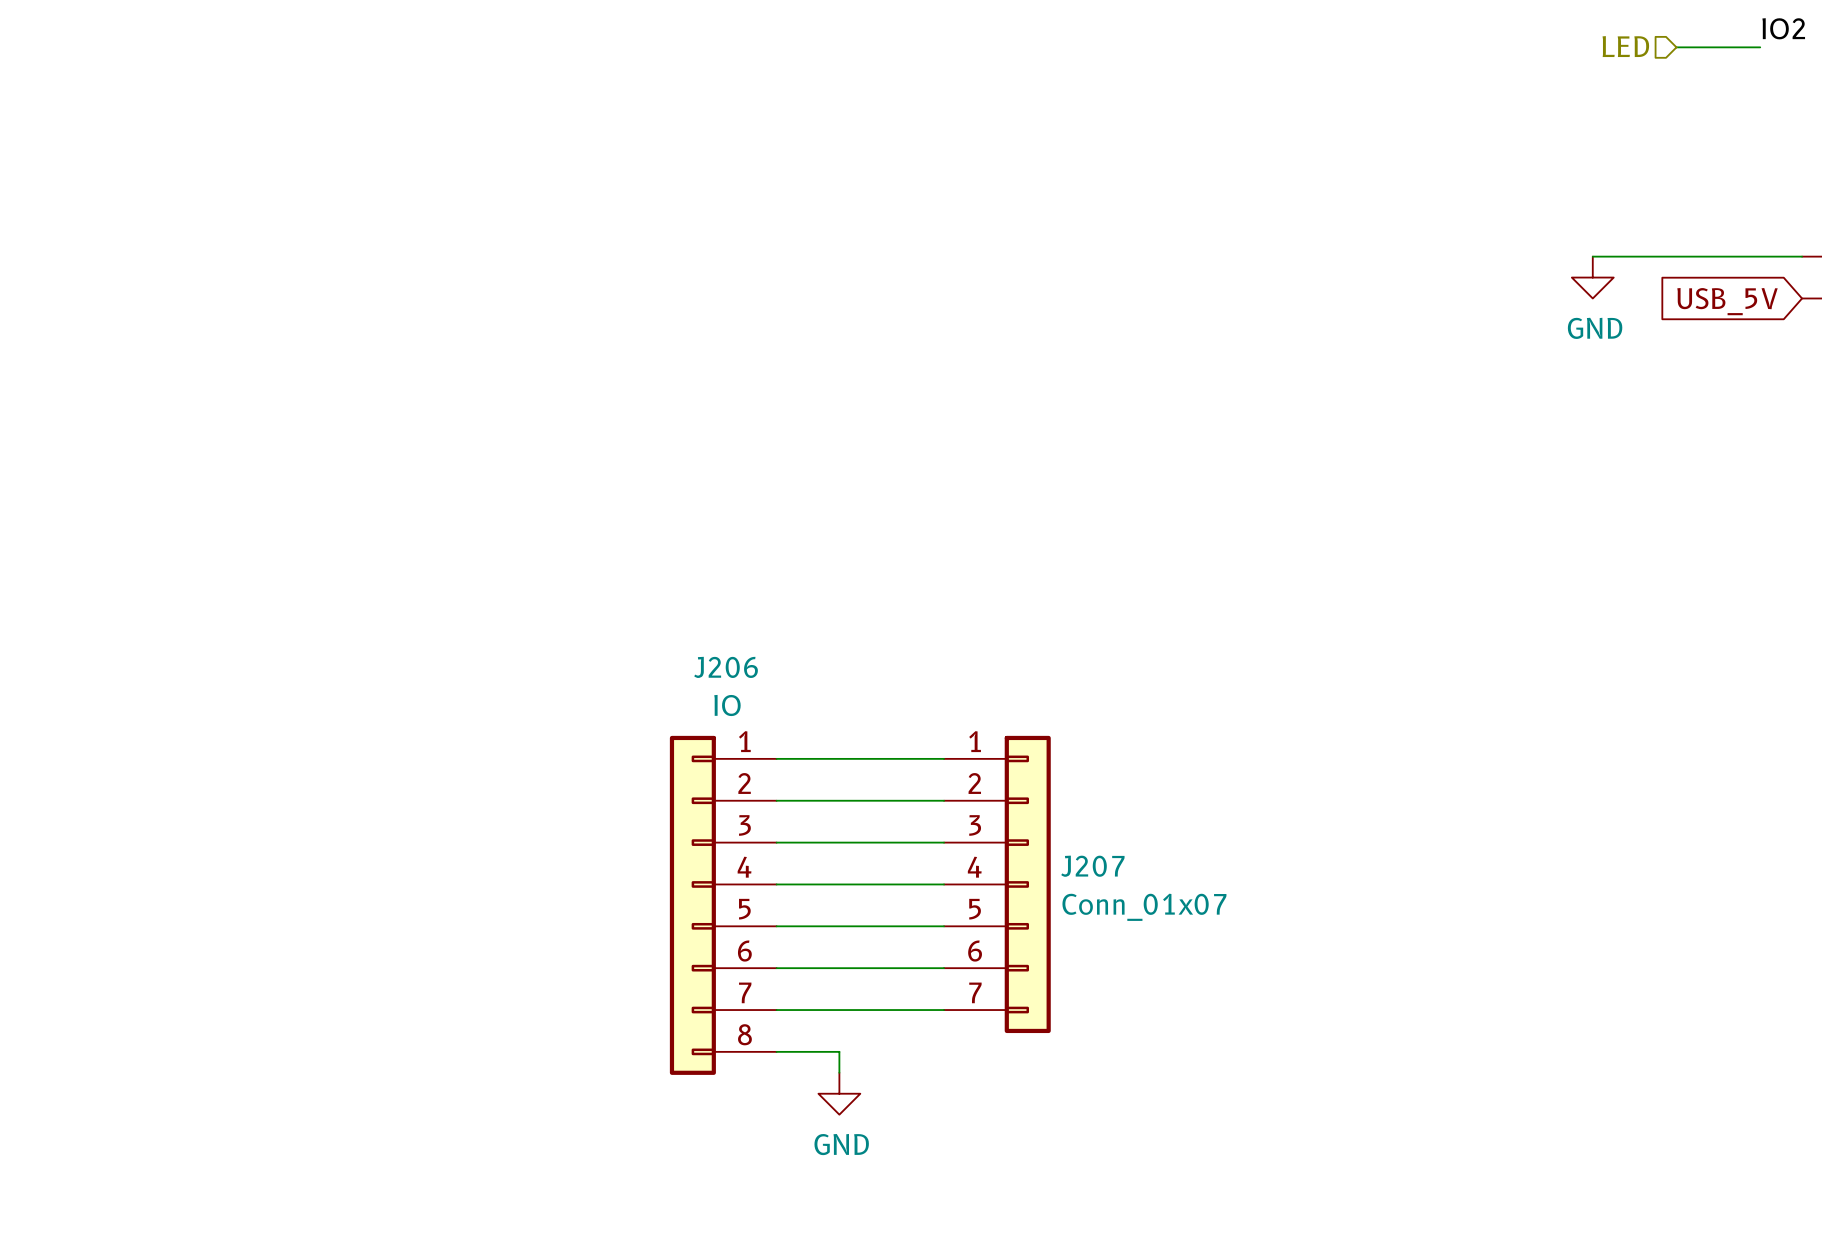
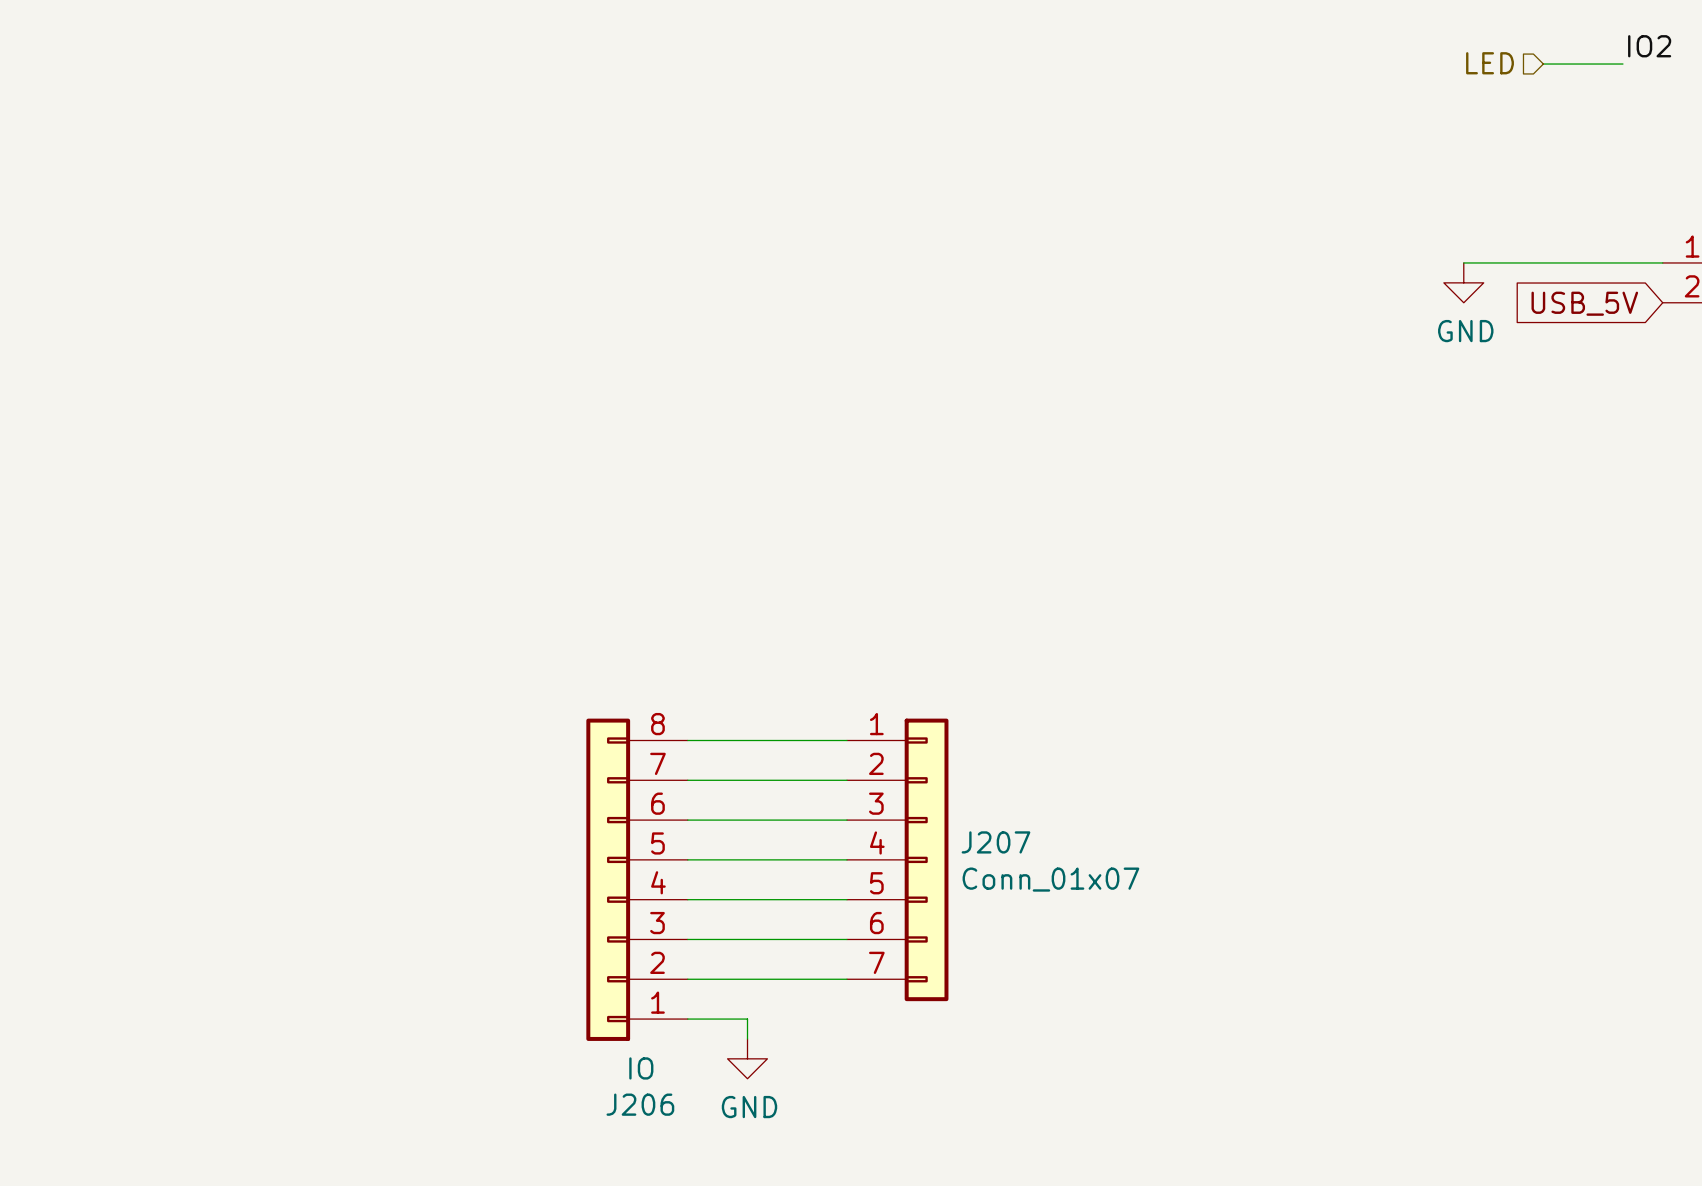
J206 flip: as is (692, 905) -> up-down (608, 879)

